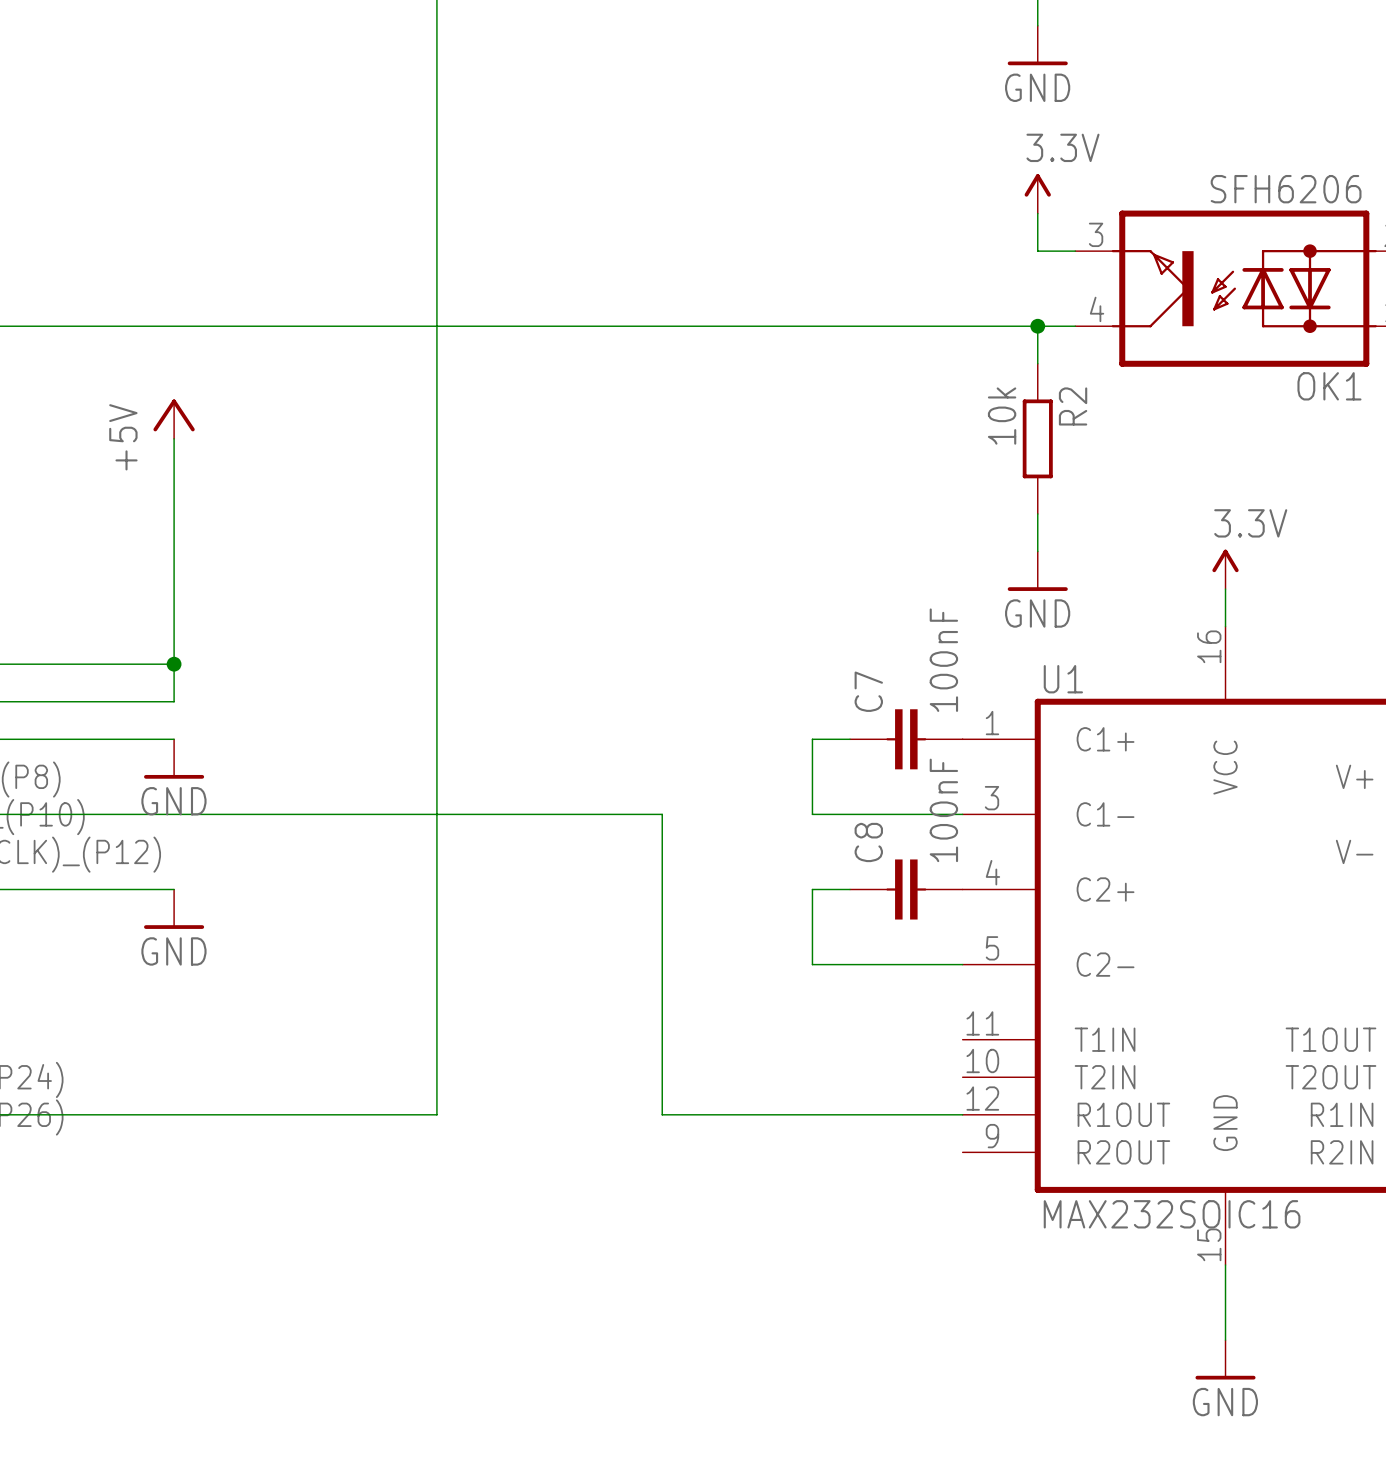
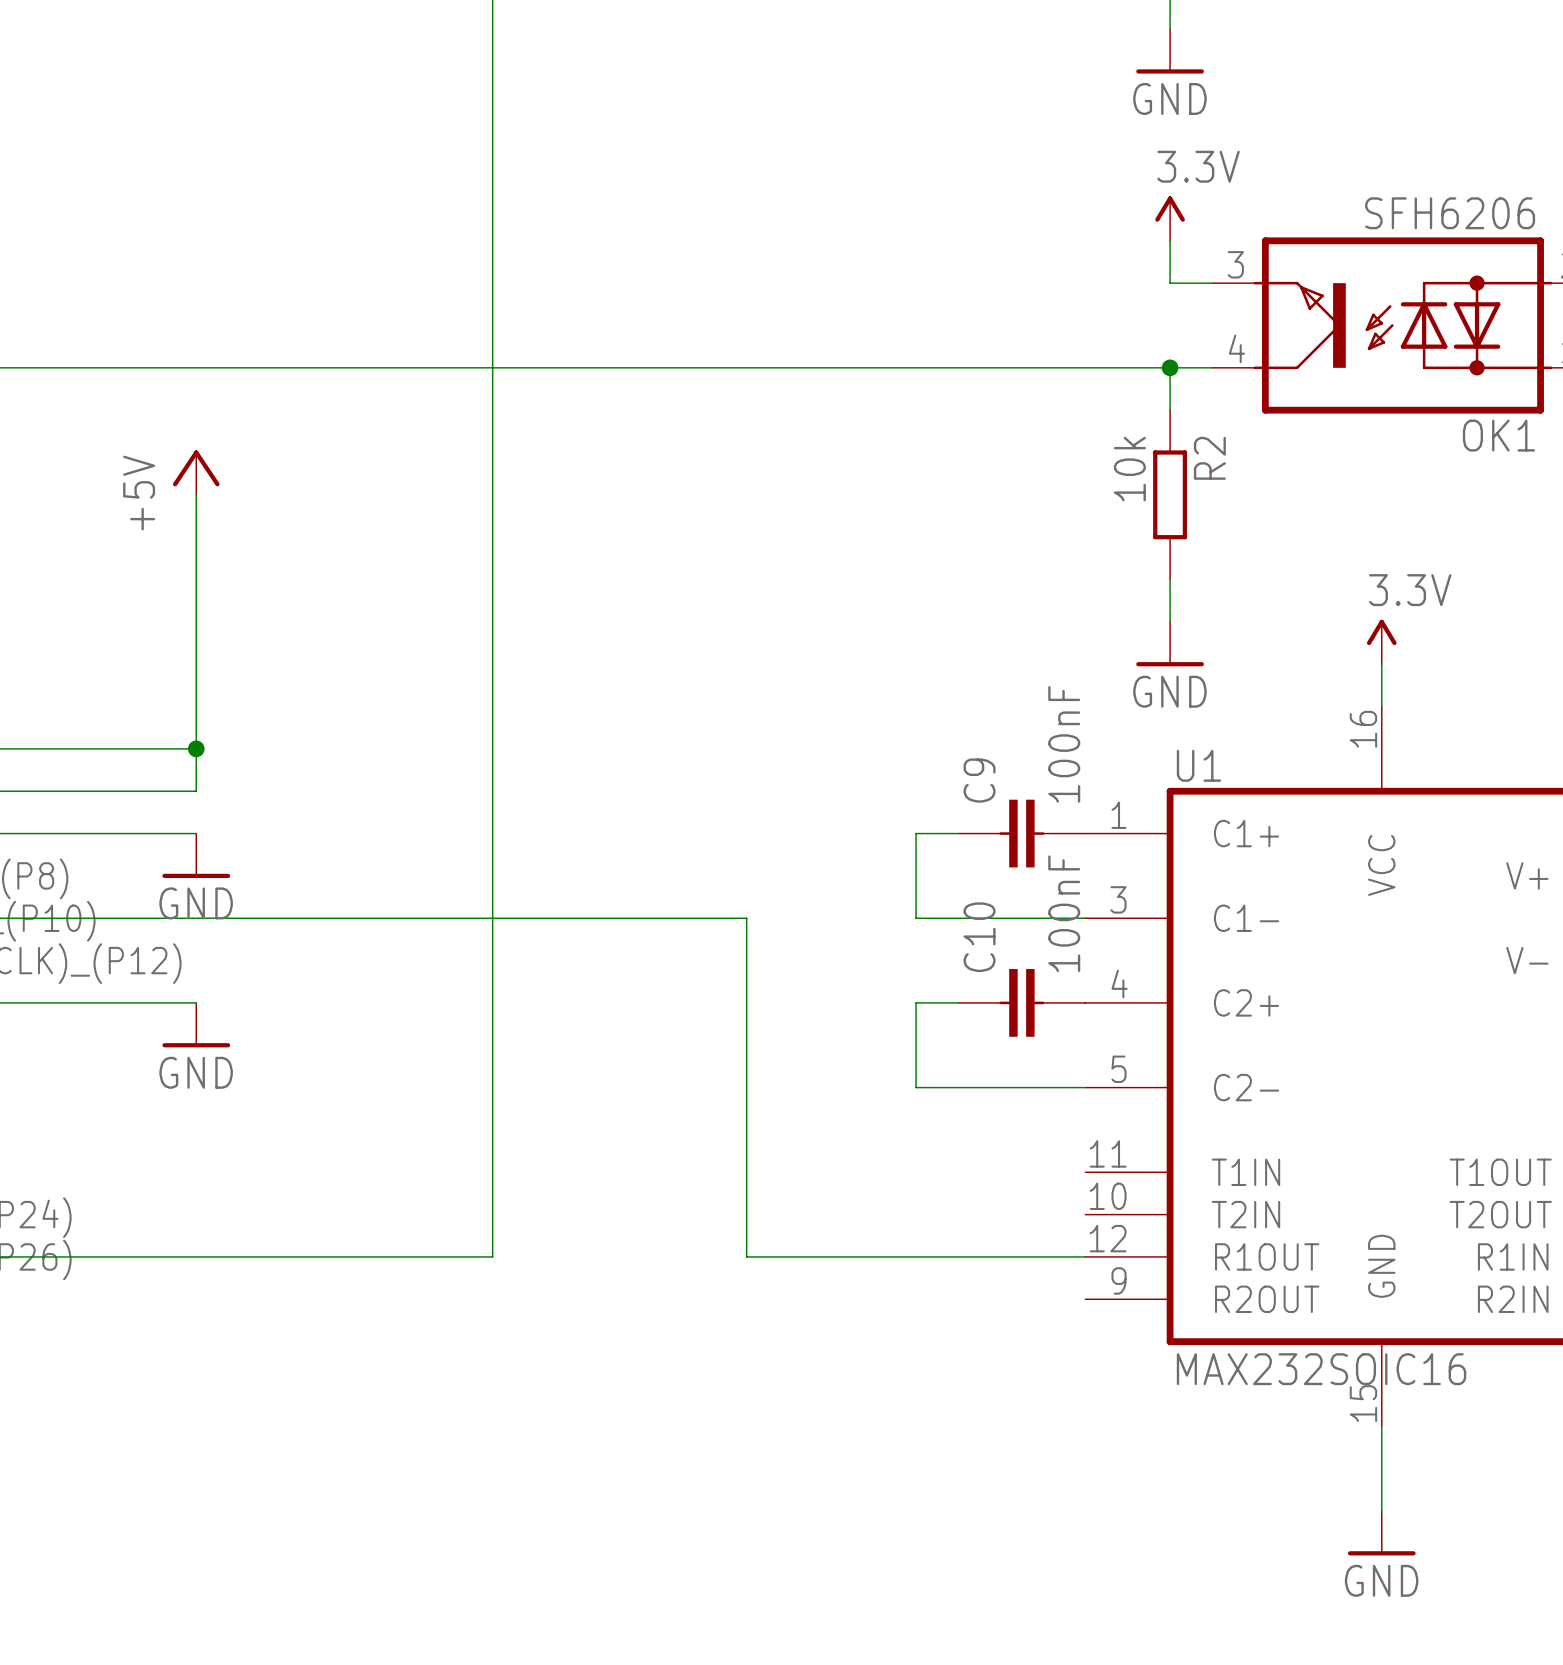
C7 name: C7 (868, 691) -> C9 (979, 780)
C8 name: C8 (868, 842) -> C10 (979, 937)

